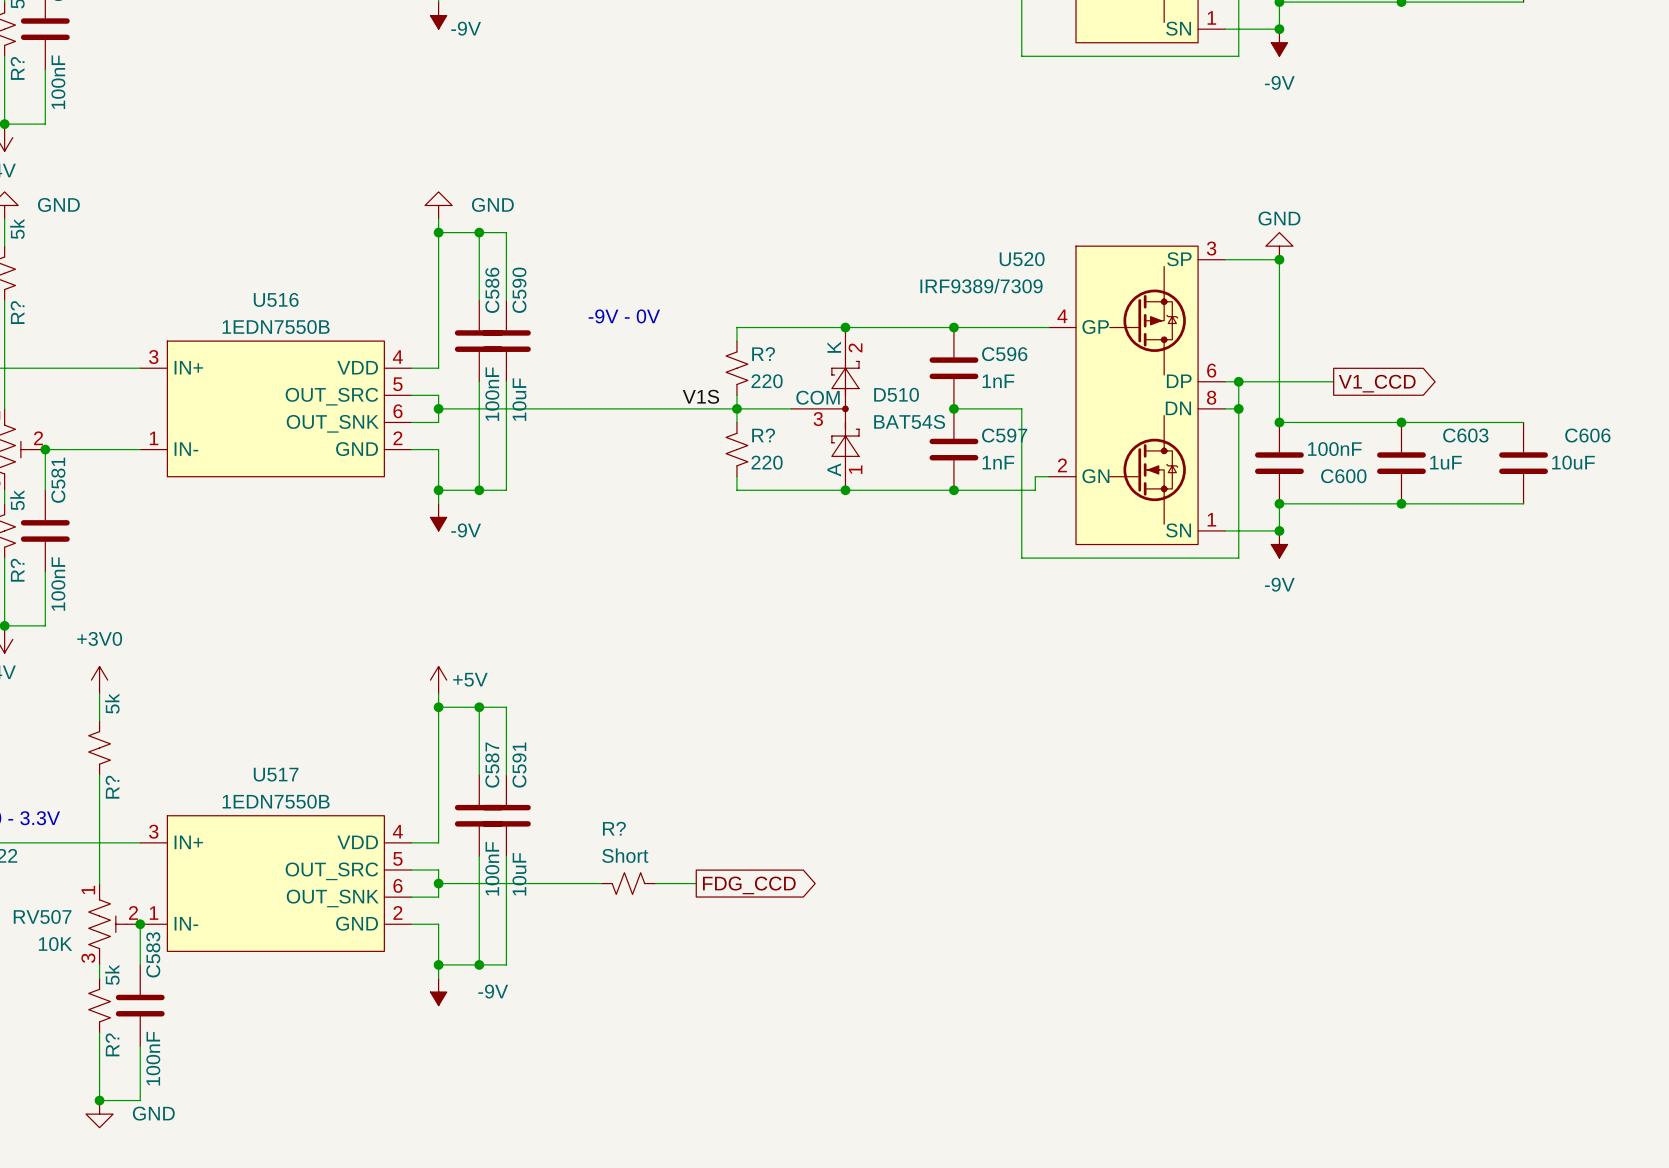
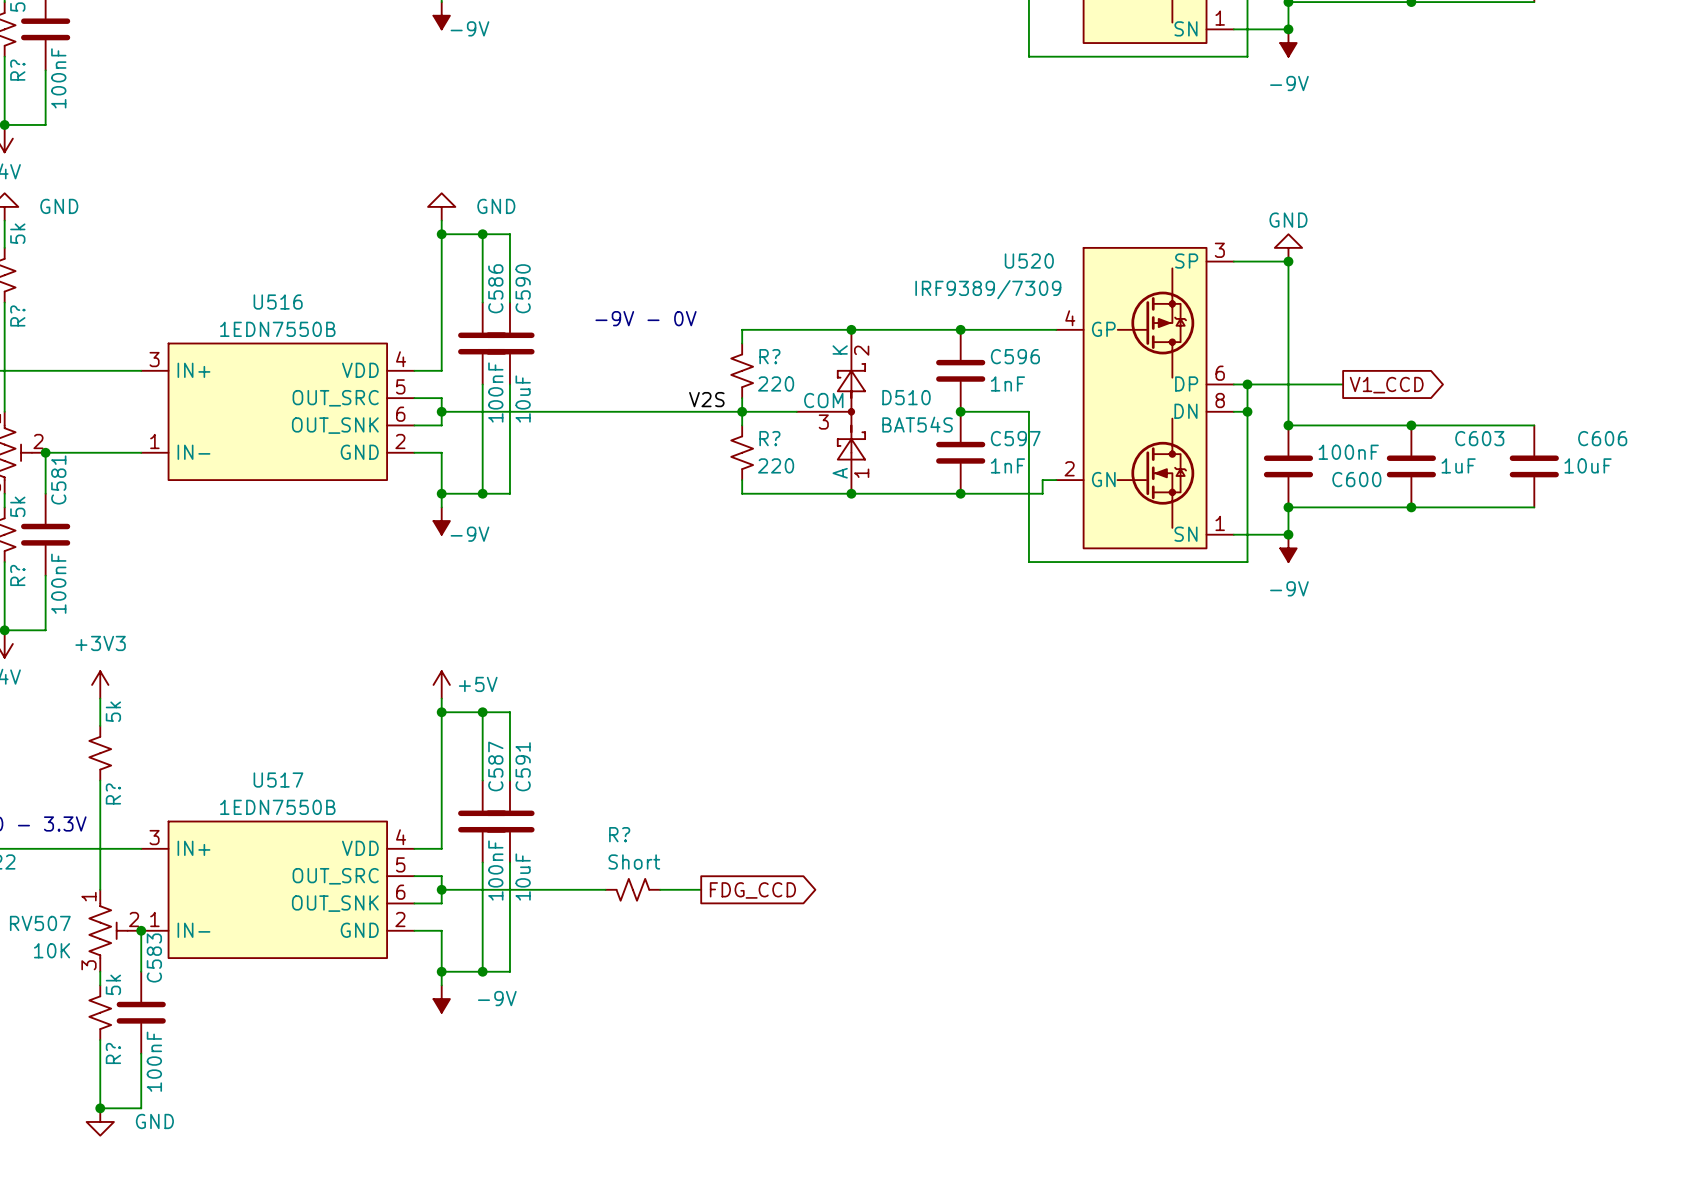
label: V1S (700, 396) -> V2S (706, 399)
power symbol: +3V0 (99, 680) -> +3V3 (100, 684)

